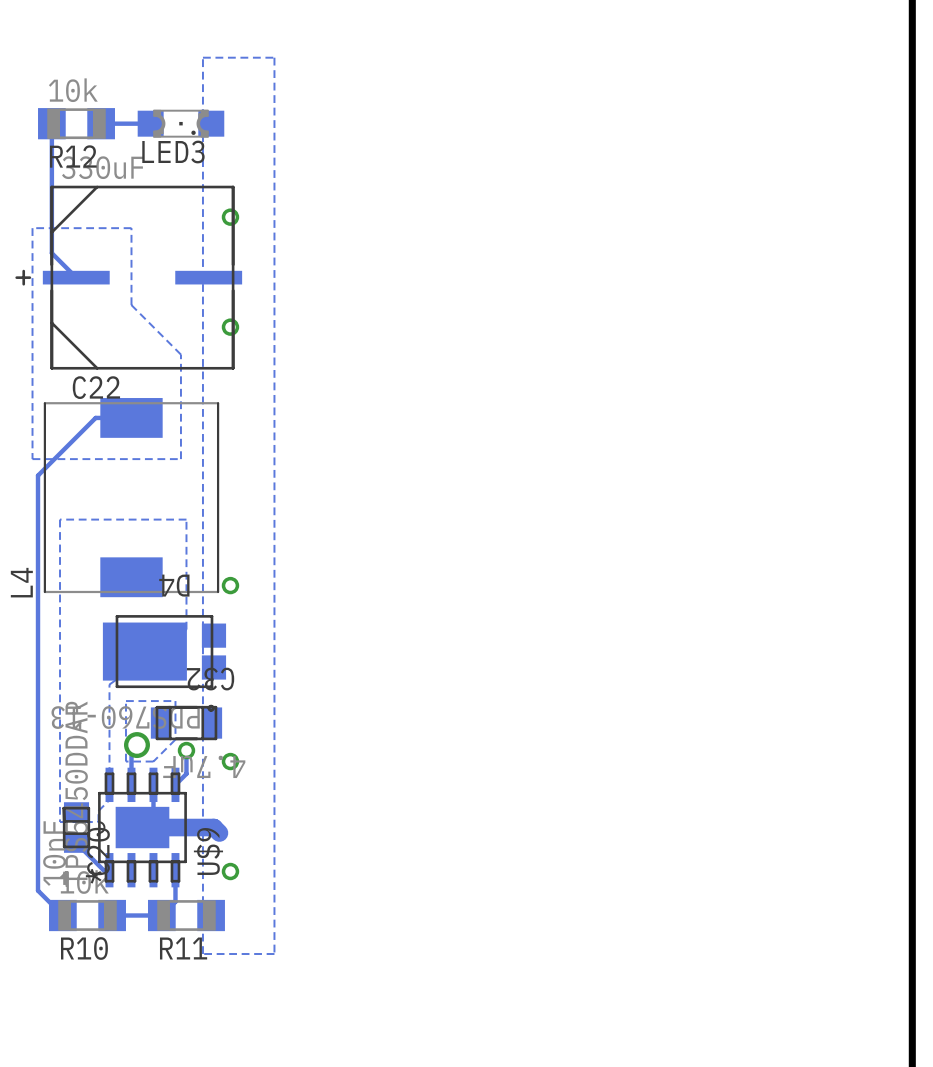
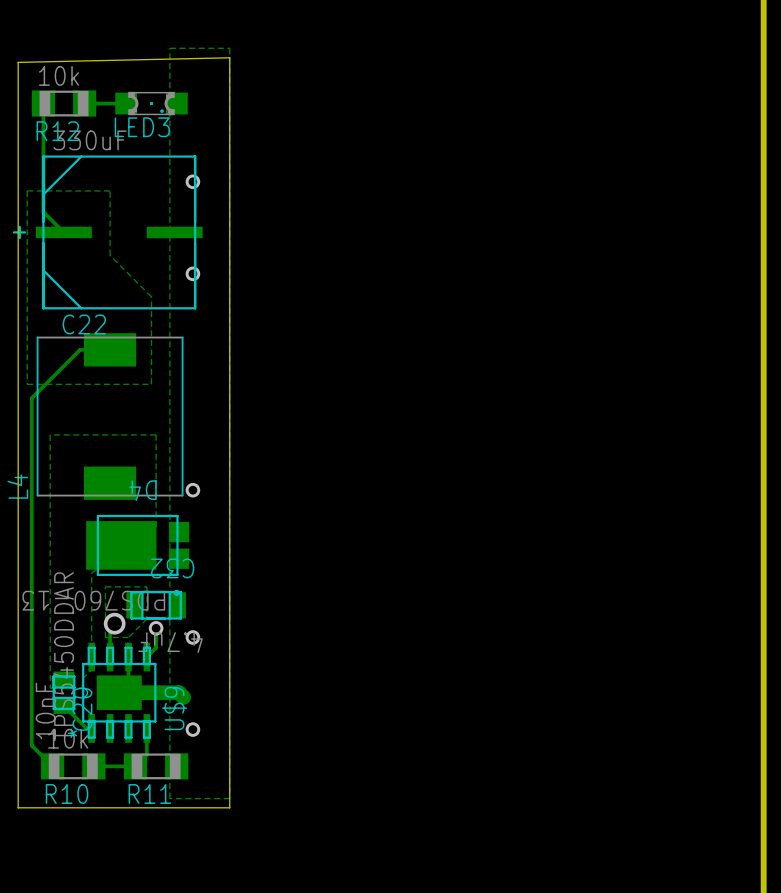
board edge: none -> (229, 57) (229, 807) (18, 807) (18, 62) (229, 57)

